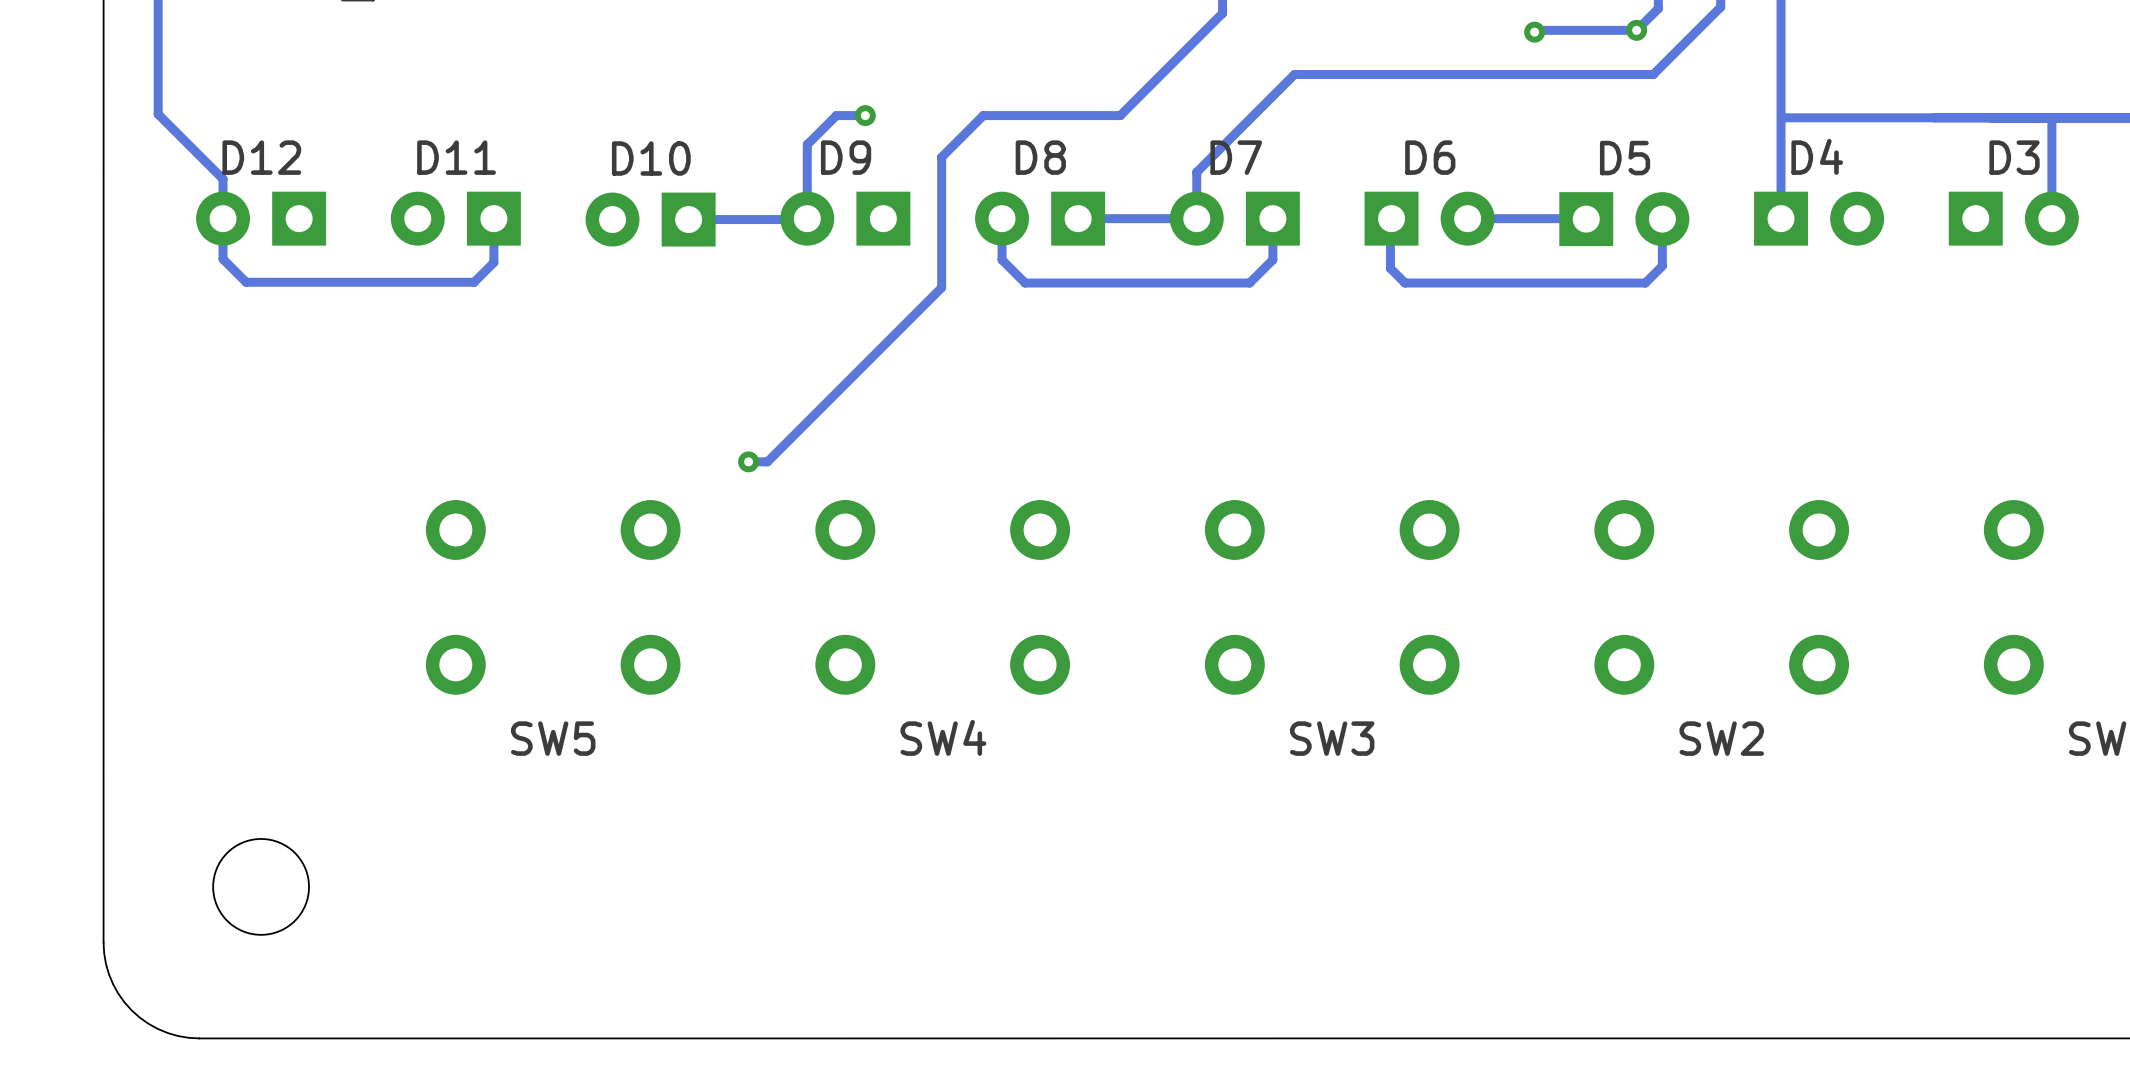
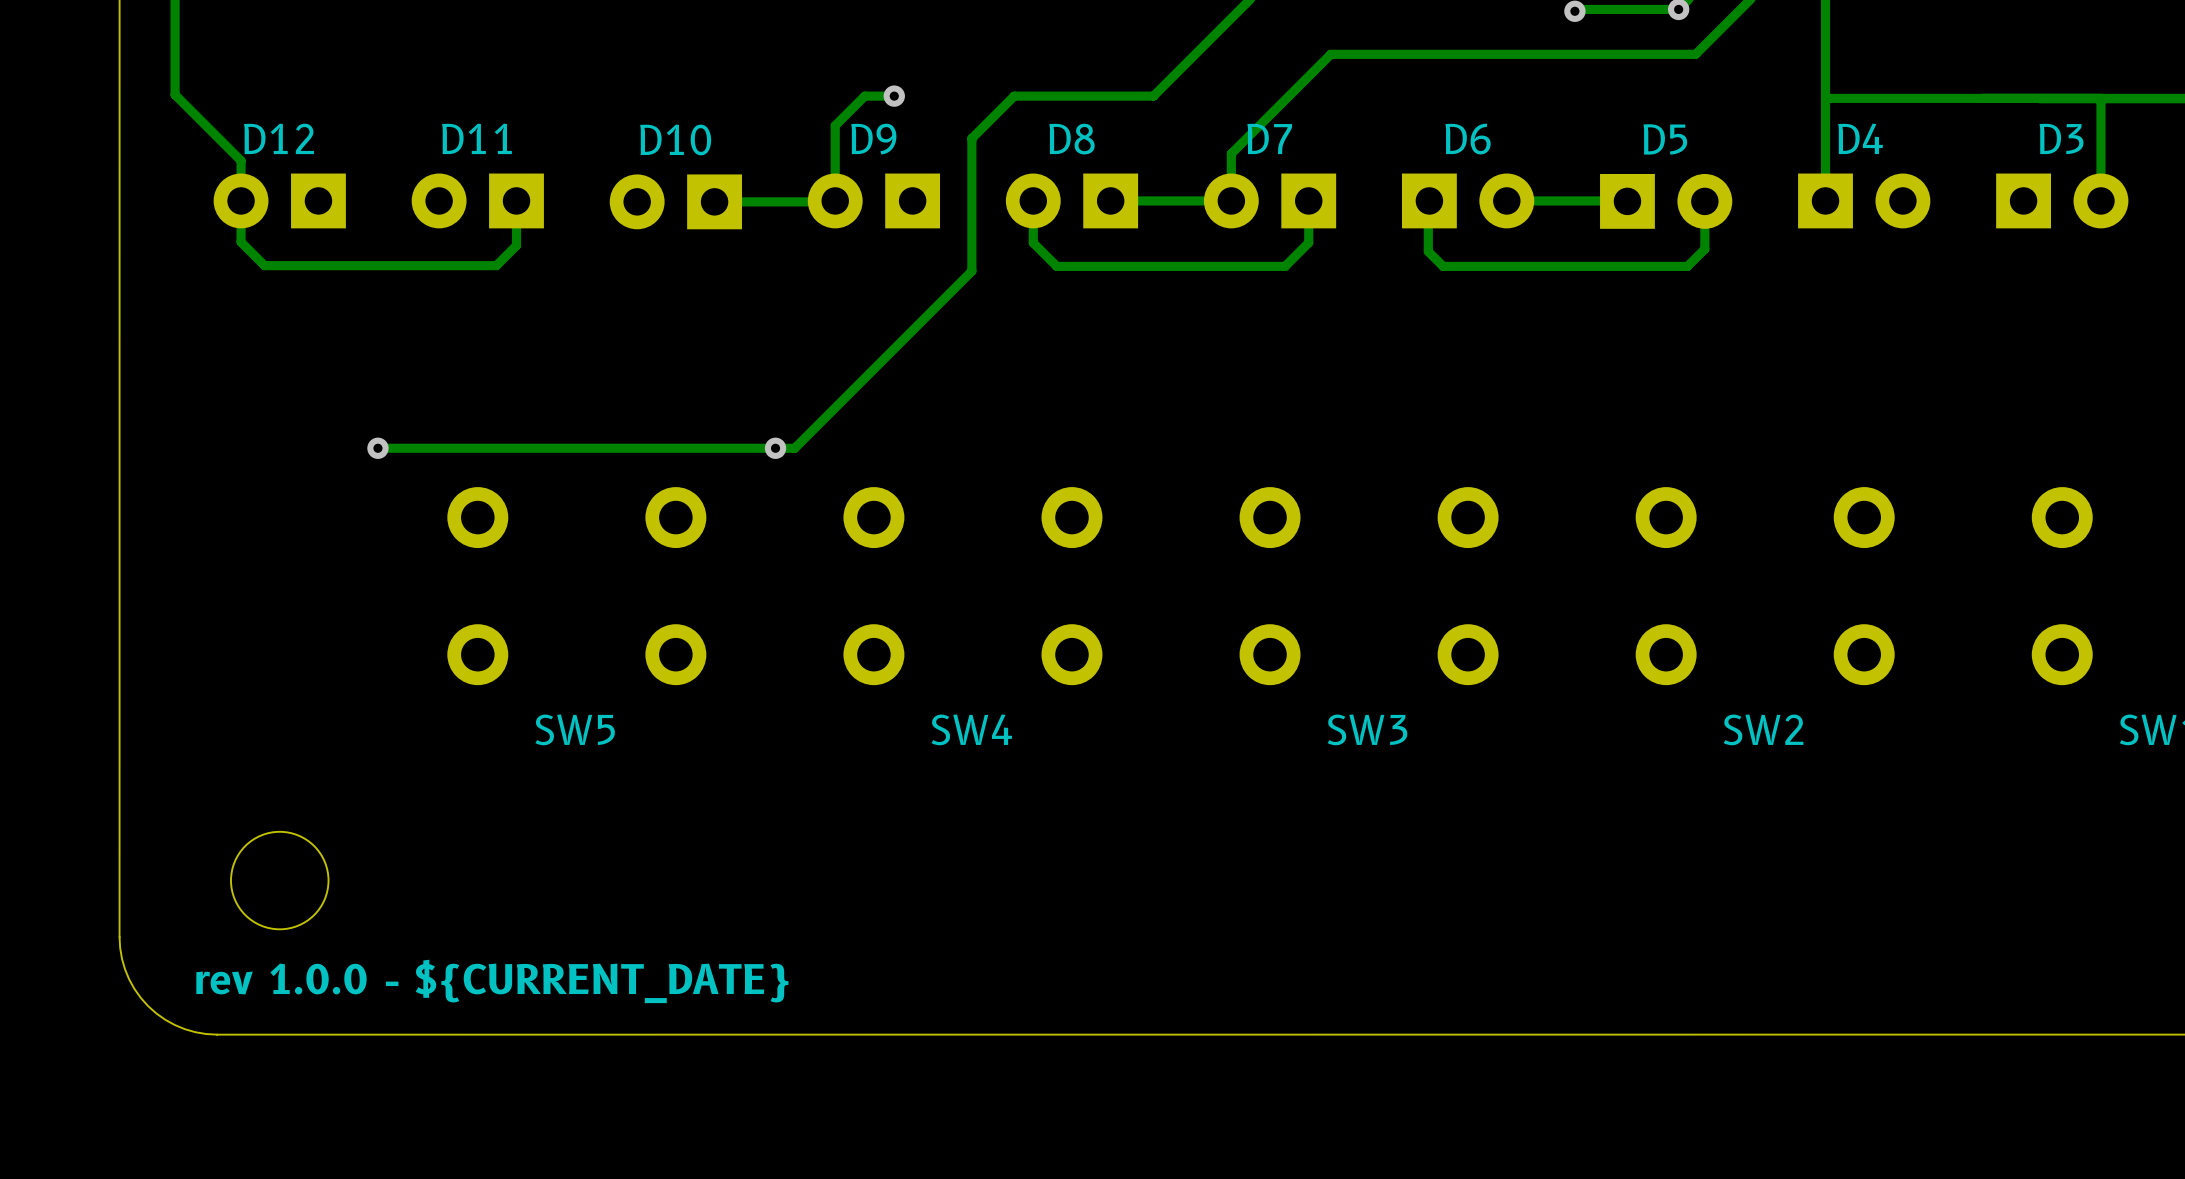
via: none -> (377, 448)
track: none -> (775, 448) (379, 448) (377, 449)
text: none -> rev 1.0.0 - ${CURRENT_DATE} (492, 981)

